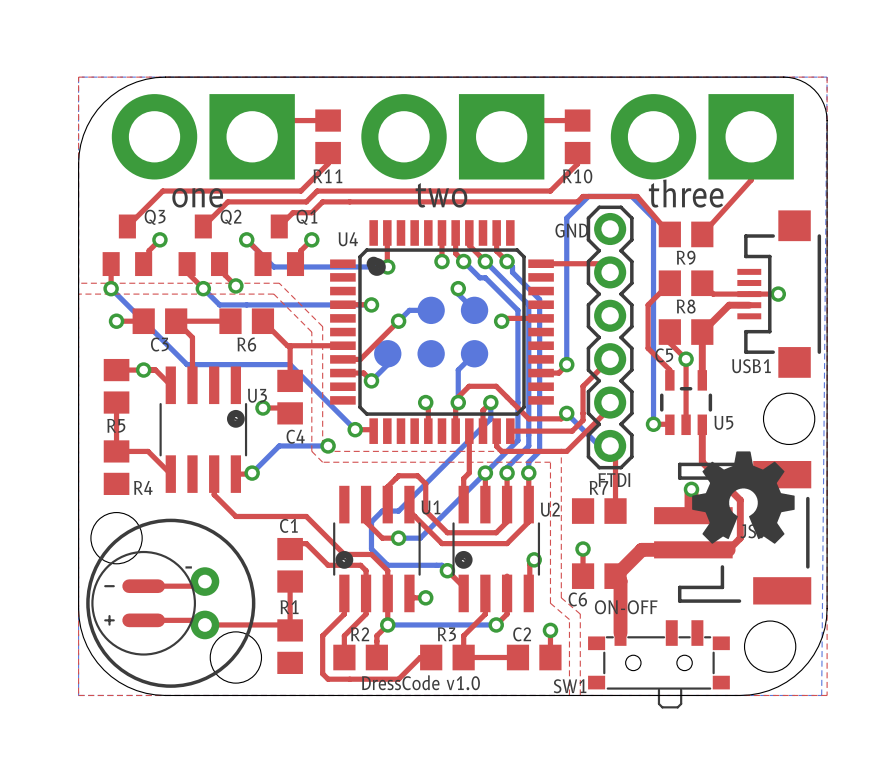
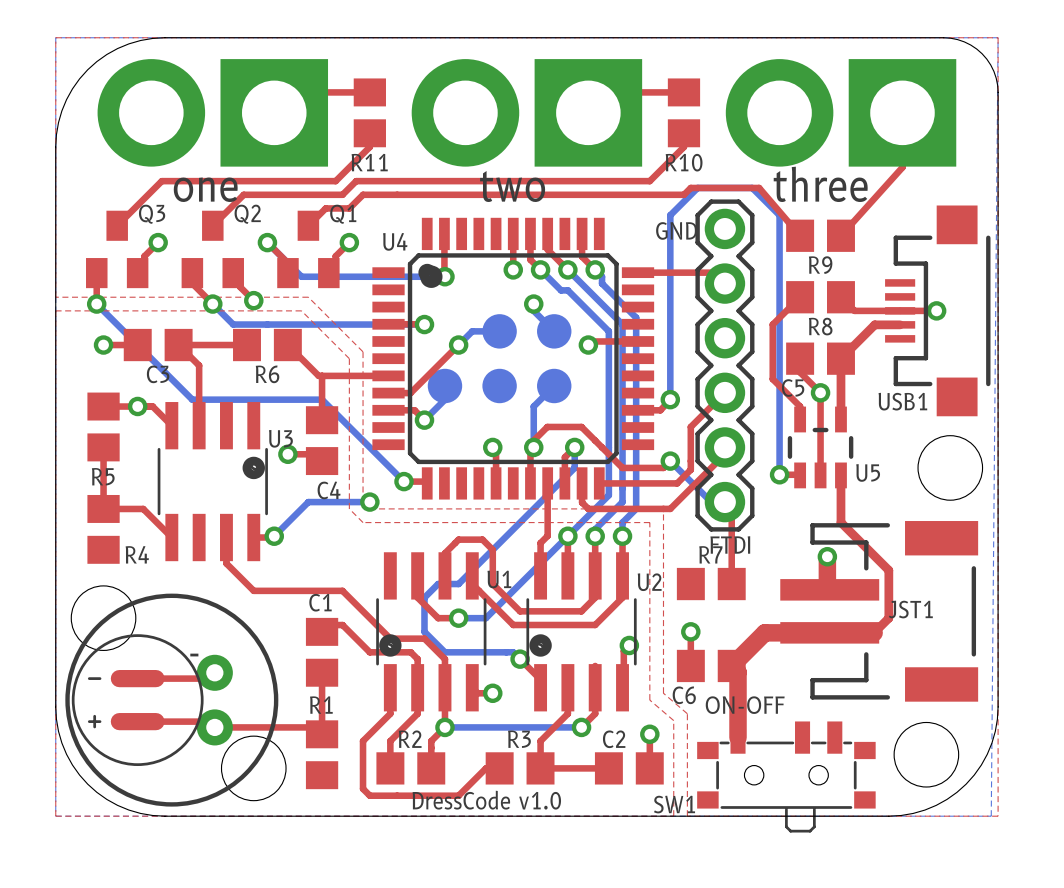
drawing: [692, 451, 795, 544] -> none

